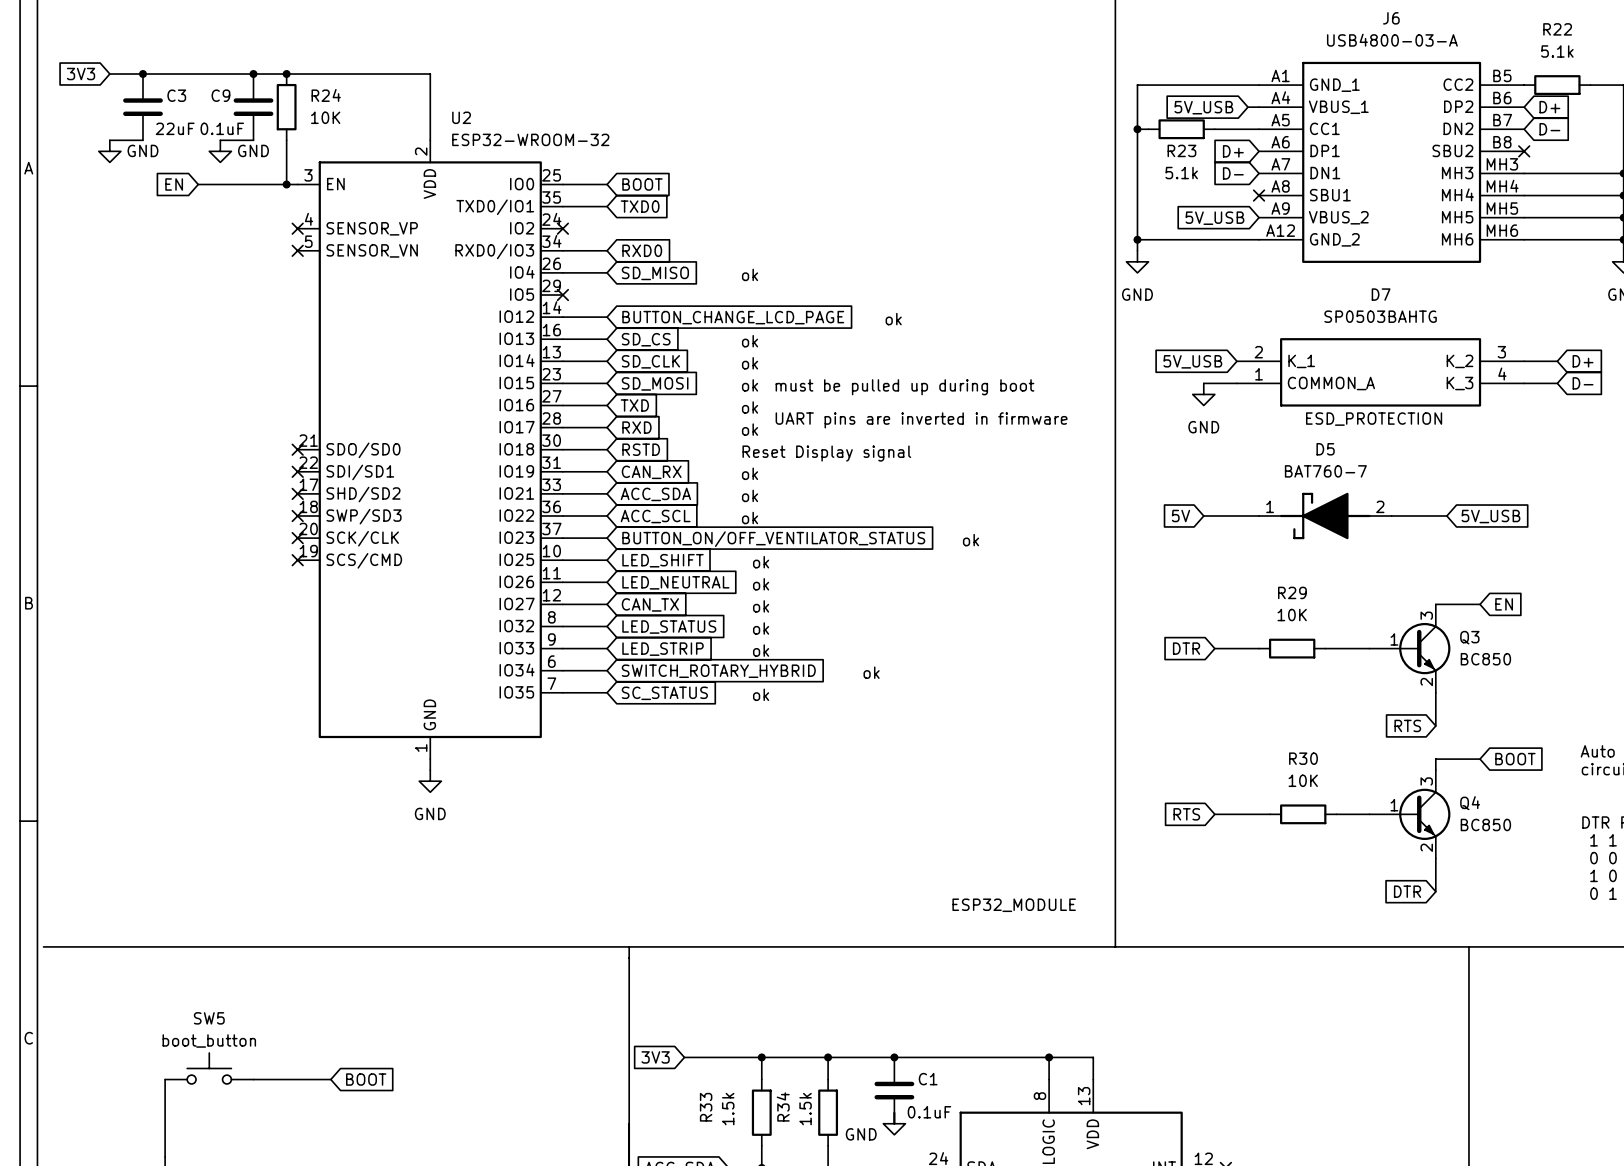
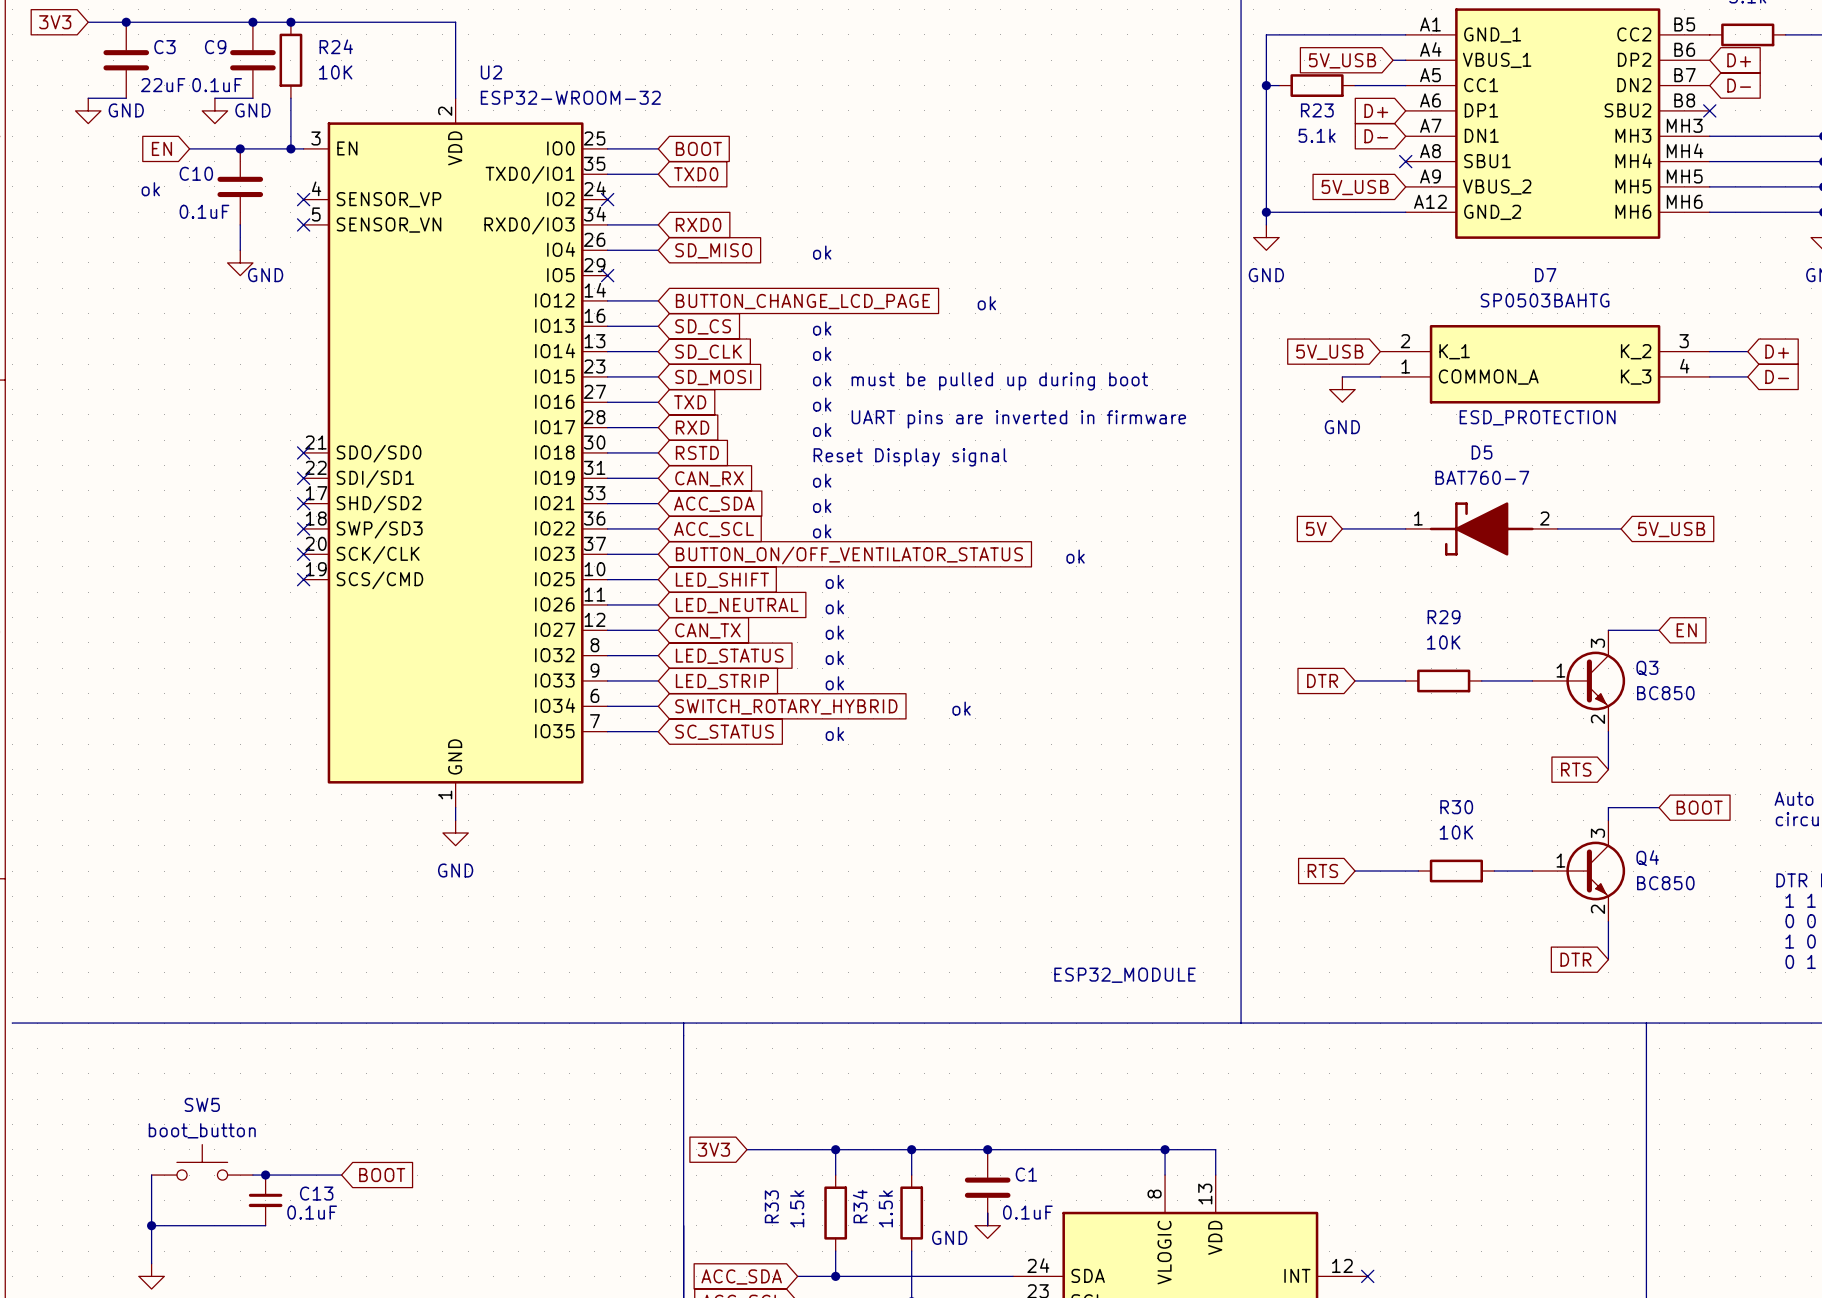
junction: none -> (240, 148)
C10: none -> 0.1uF (240, 186)
text: none -> ok (150, 189)
wire: none -> (240, 224) (240, 250)
power symbol: none -> GND (240, 262)
junction: none -> (265, 1175)
C13: none -> 0.1uF (265, 1200)
wire: none -> (151, 1225) (265, 1225)
junction: none -> (151, 1225)

